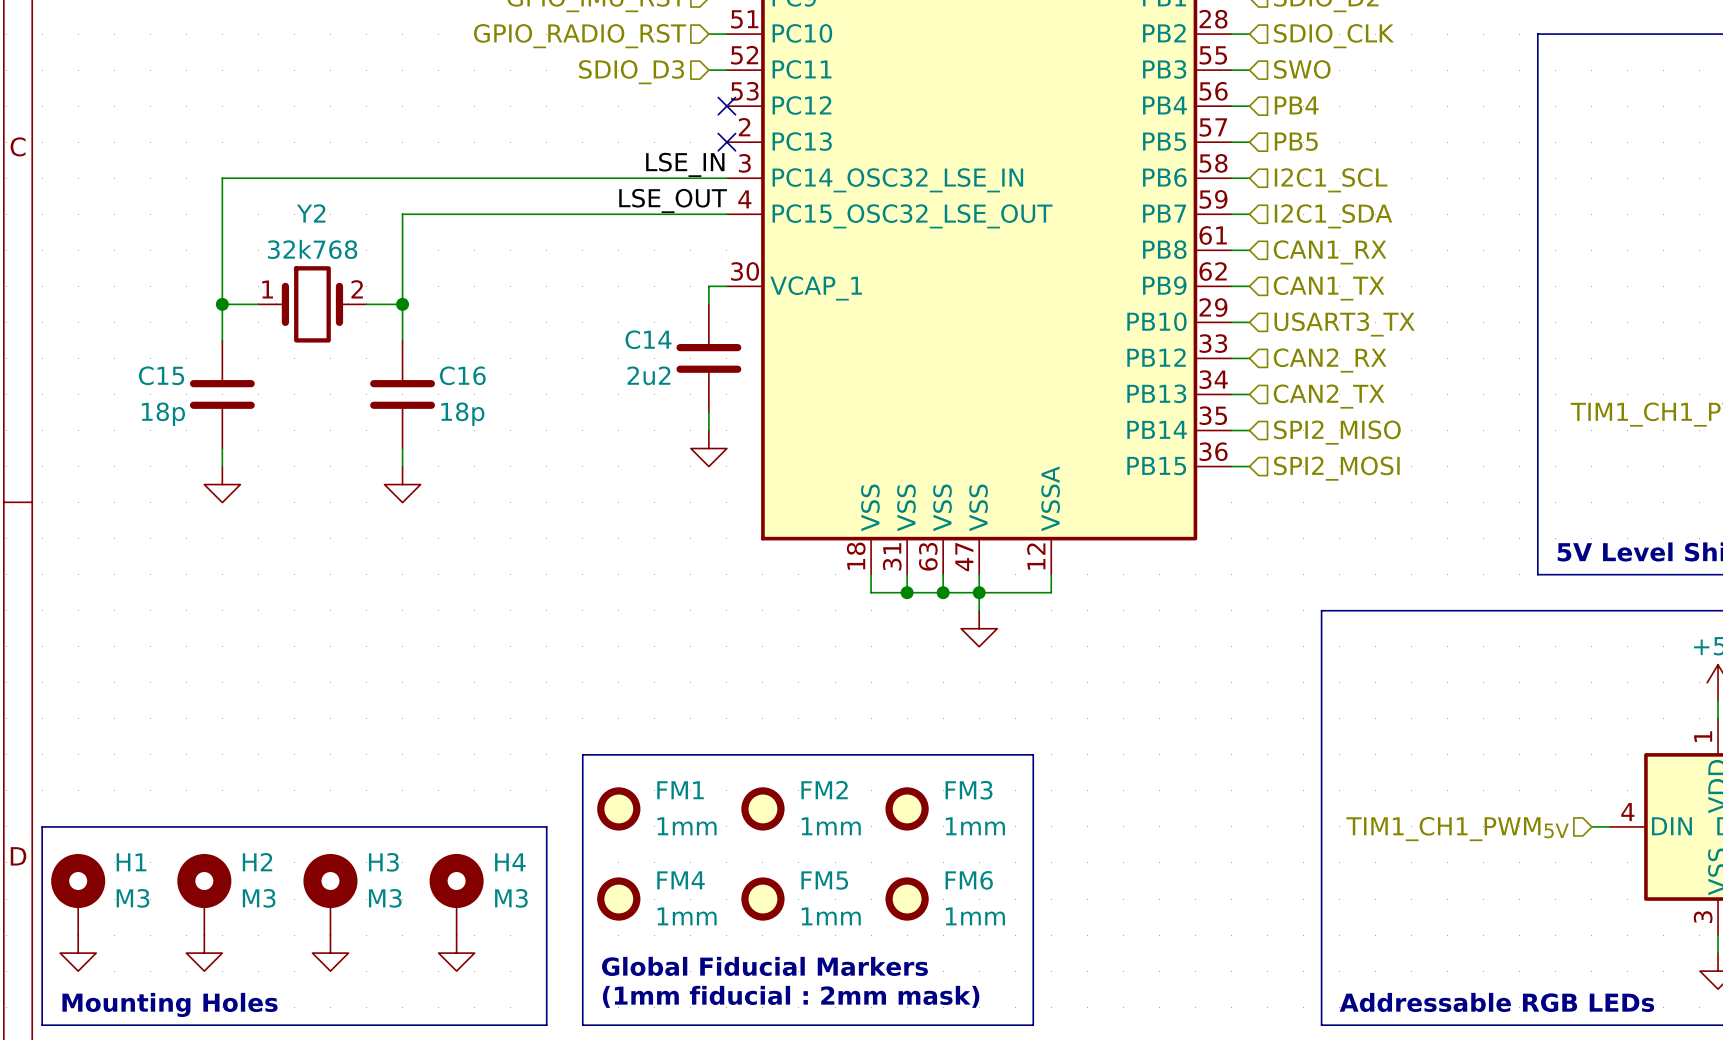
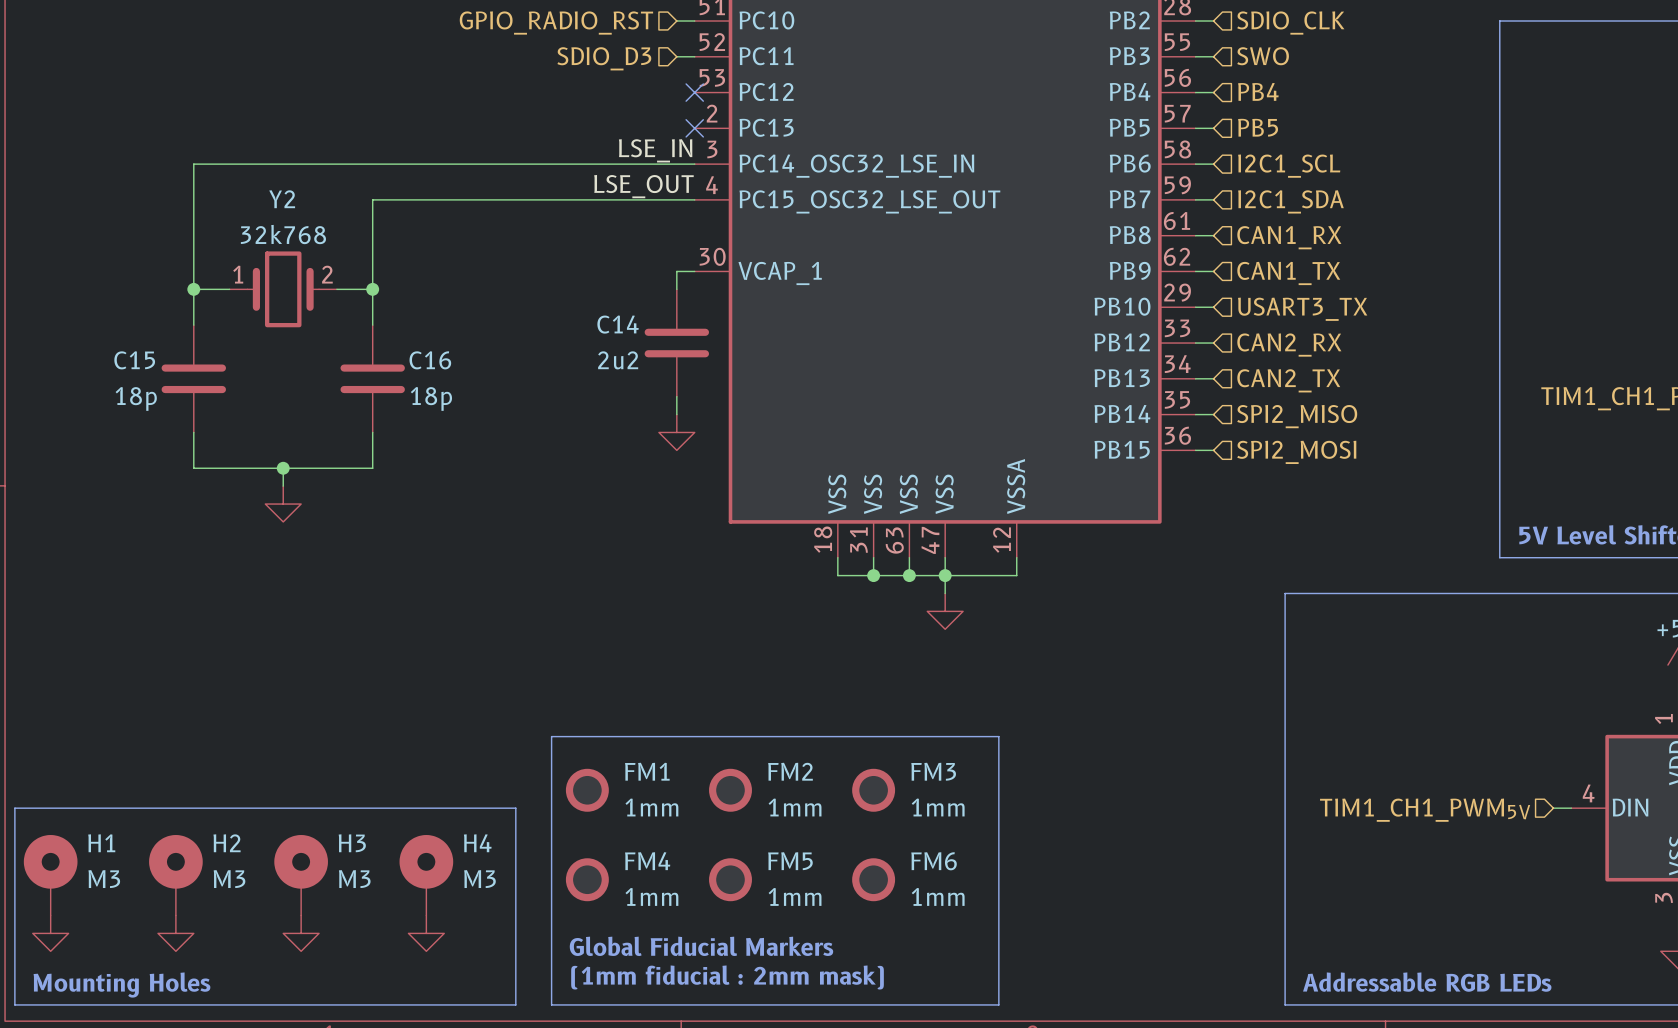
wire: none -> (193, 450) (193, 468) (372, 468) (372, 450)
power symbol: (222, 484) -> none
wire: none -> (283, 468) (283, 486)
junction: none -> (283, 468)
power symbol: (402, 484) -> none
power symbol: none -> (283, 504)

